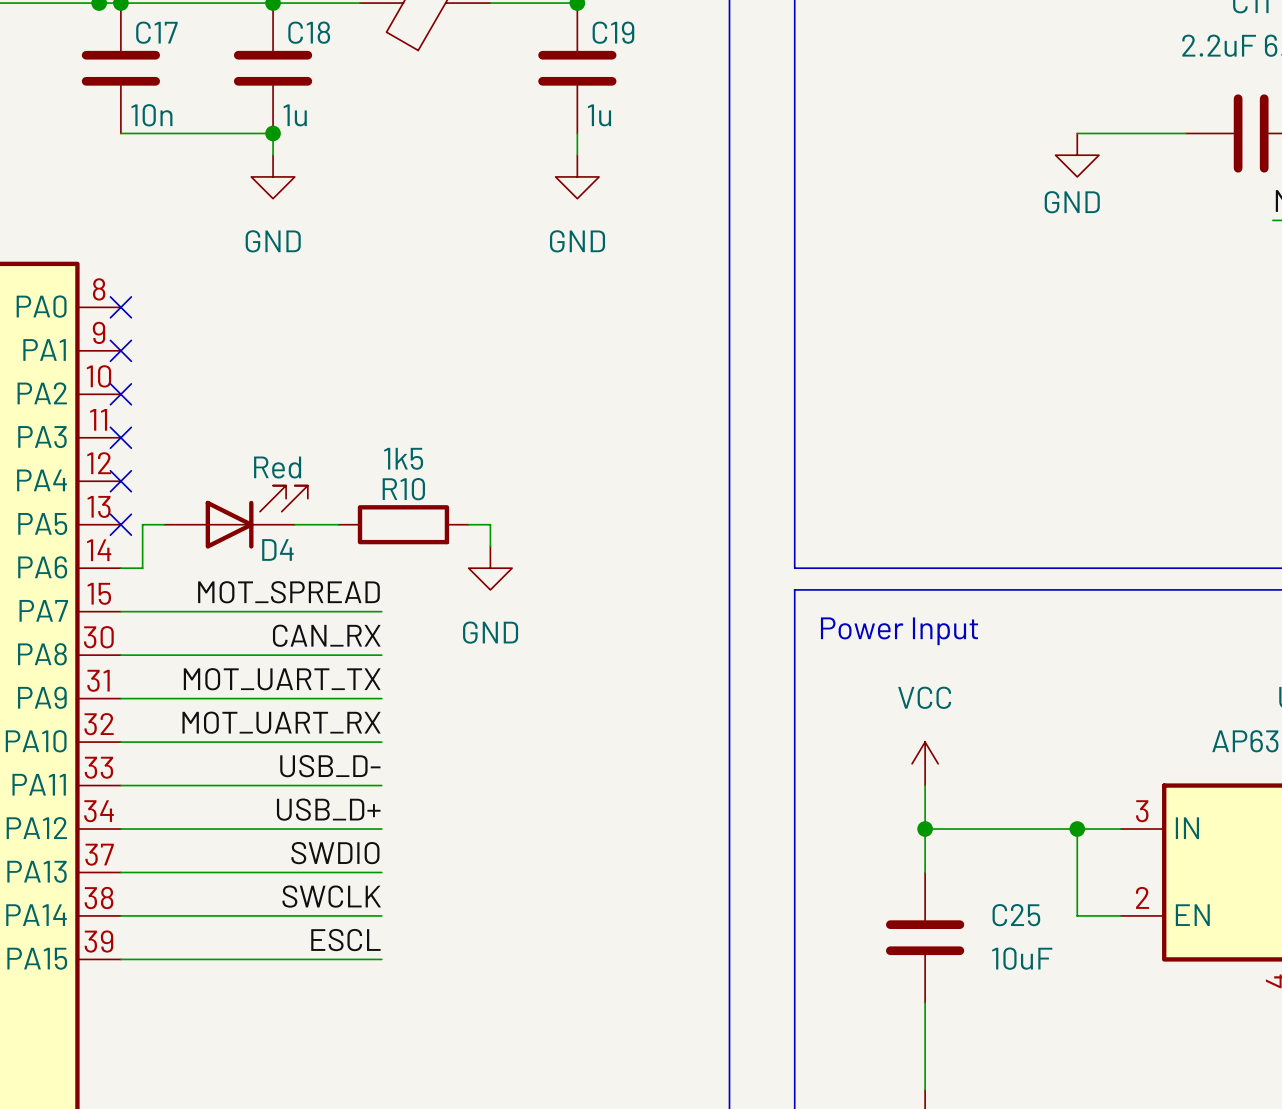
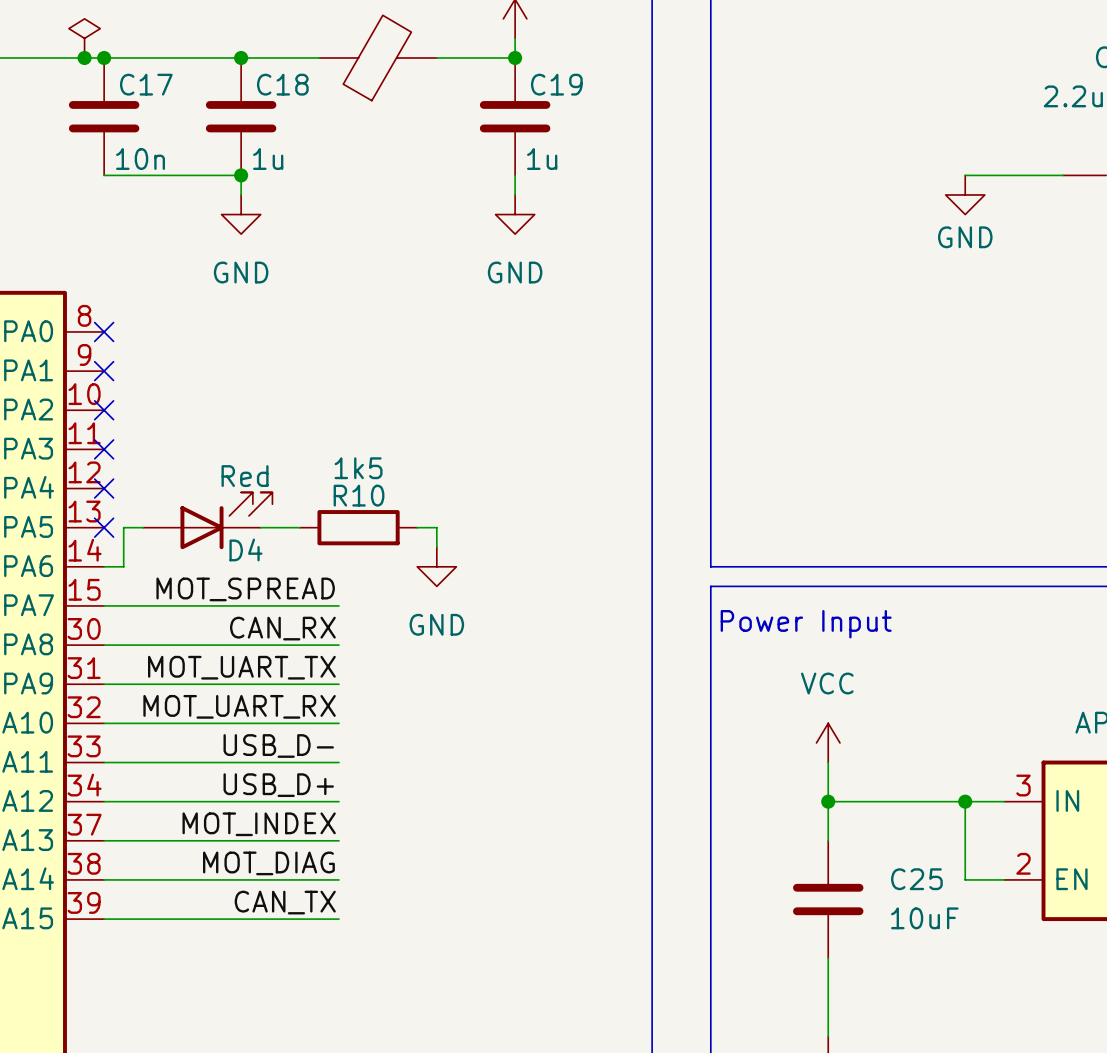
label: SWDIO (335, 853) -> MOT_INDEX (259, 824)
label: SWCLK (331, 896) -> MOT_DIAG (268, 863)
label: ESCL (345, 940) -> CAN_TX (285, 902)

